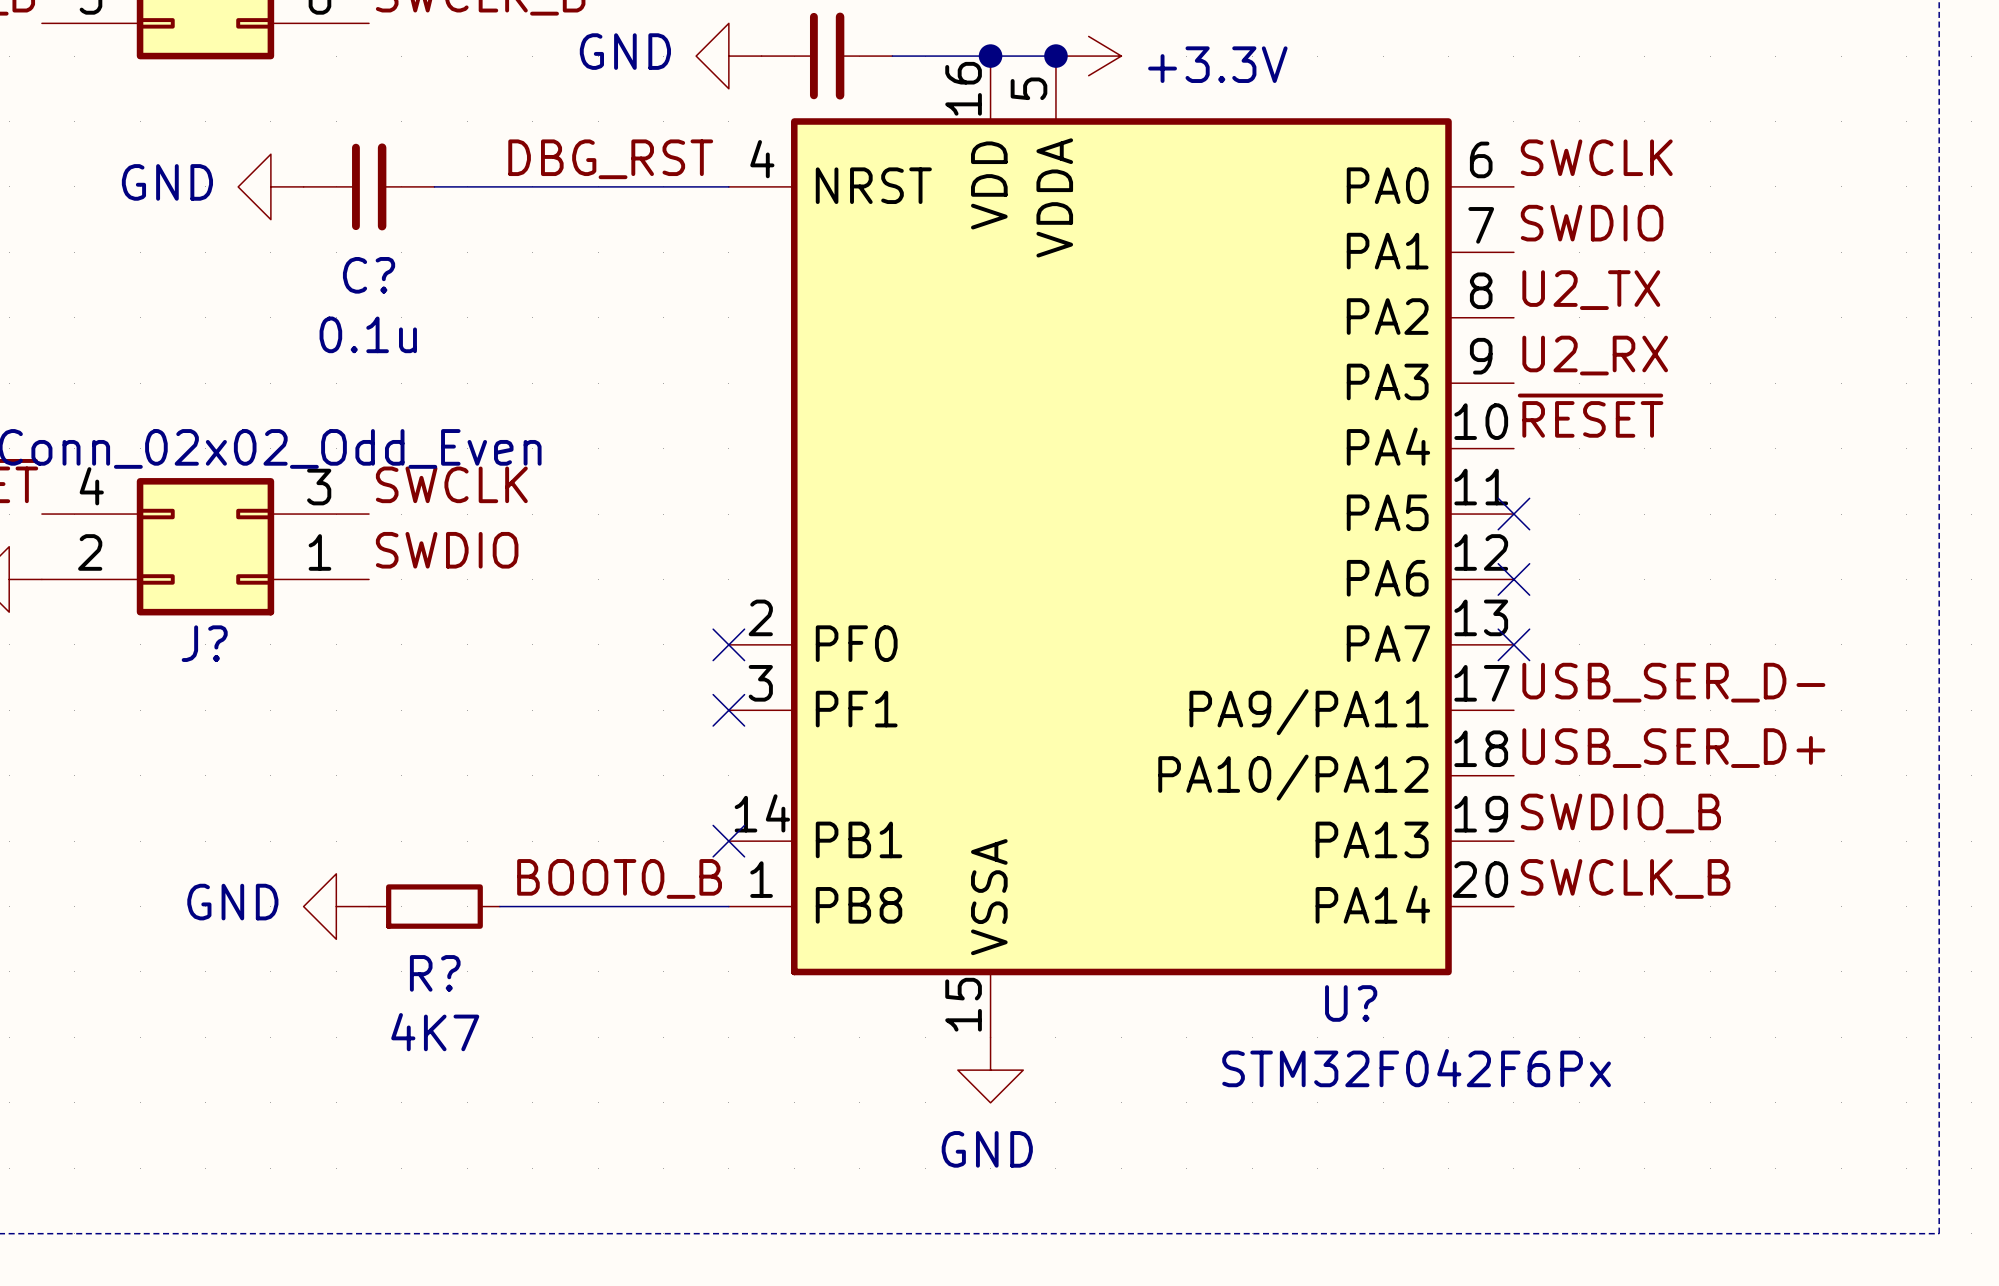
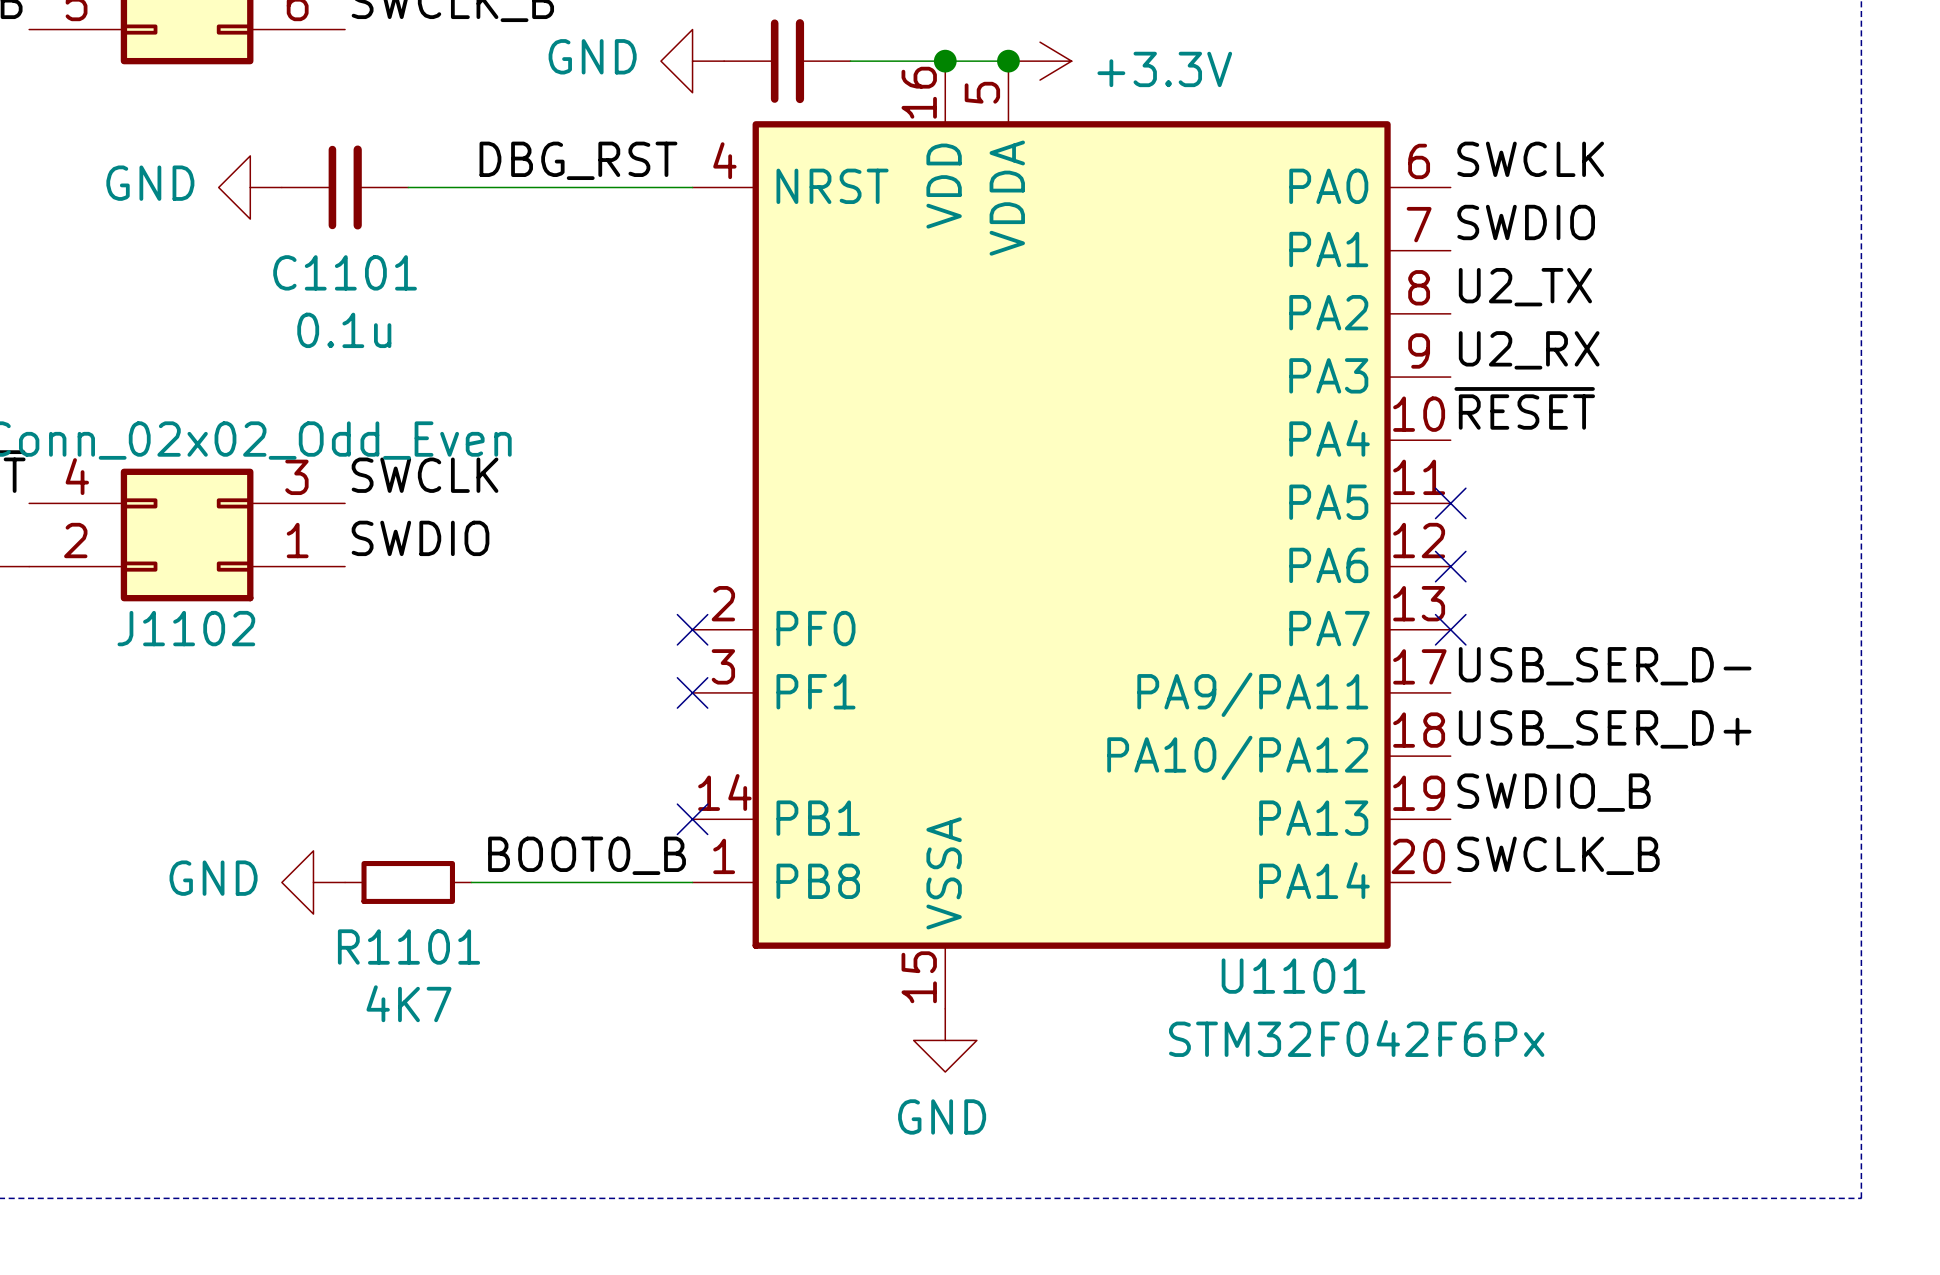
C? name: C? (369, 275) -> C1101 (345, 272)
J? name: J? (204, 643) -> J1102 (186, 628)
R? name: R? (435, 973) -> R1101 (408, 947)
U? name: U? (1351, 1003) -> U1101 (1293, 976)

